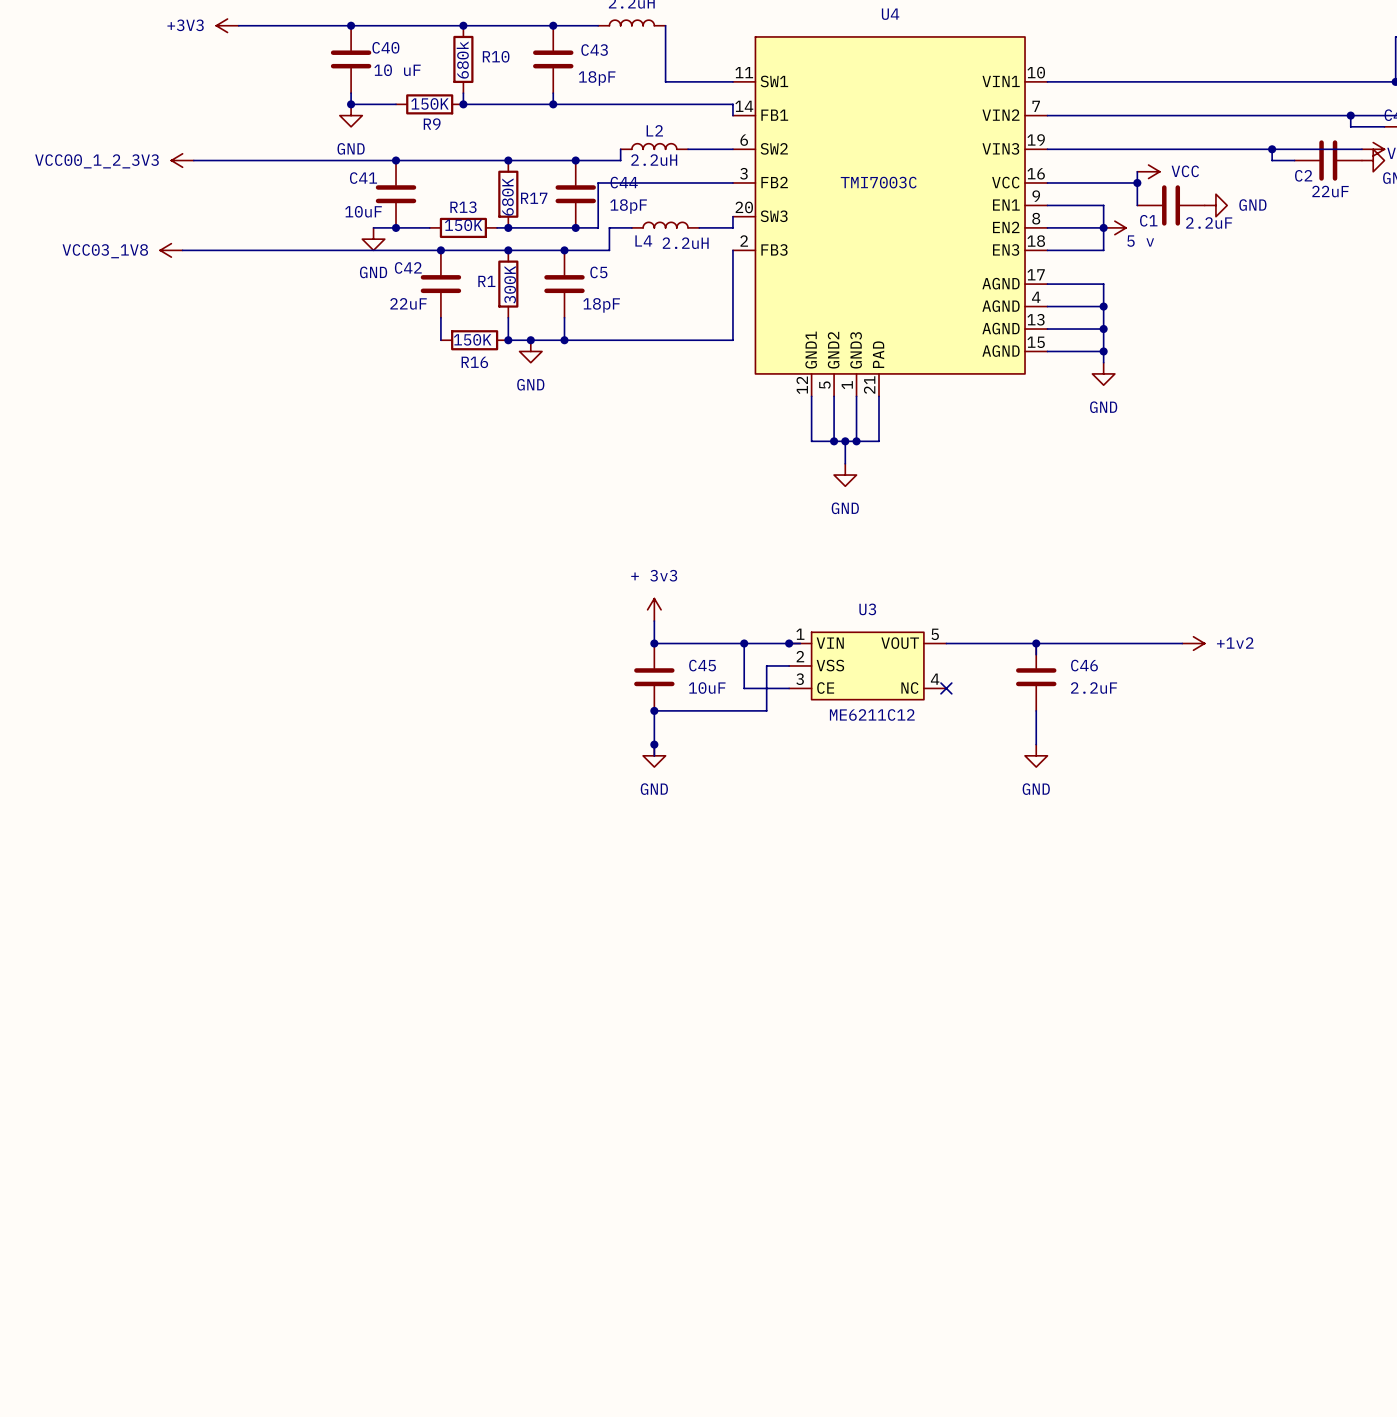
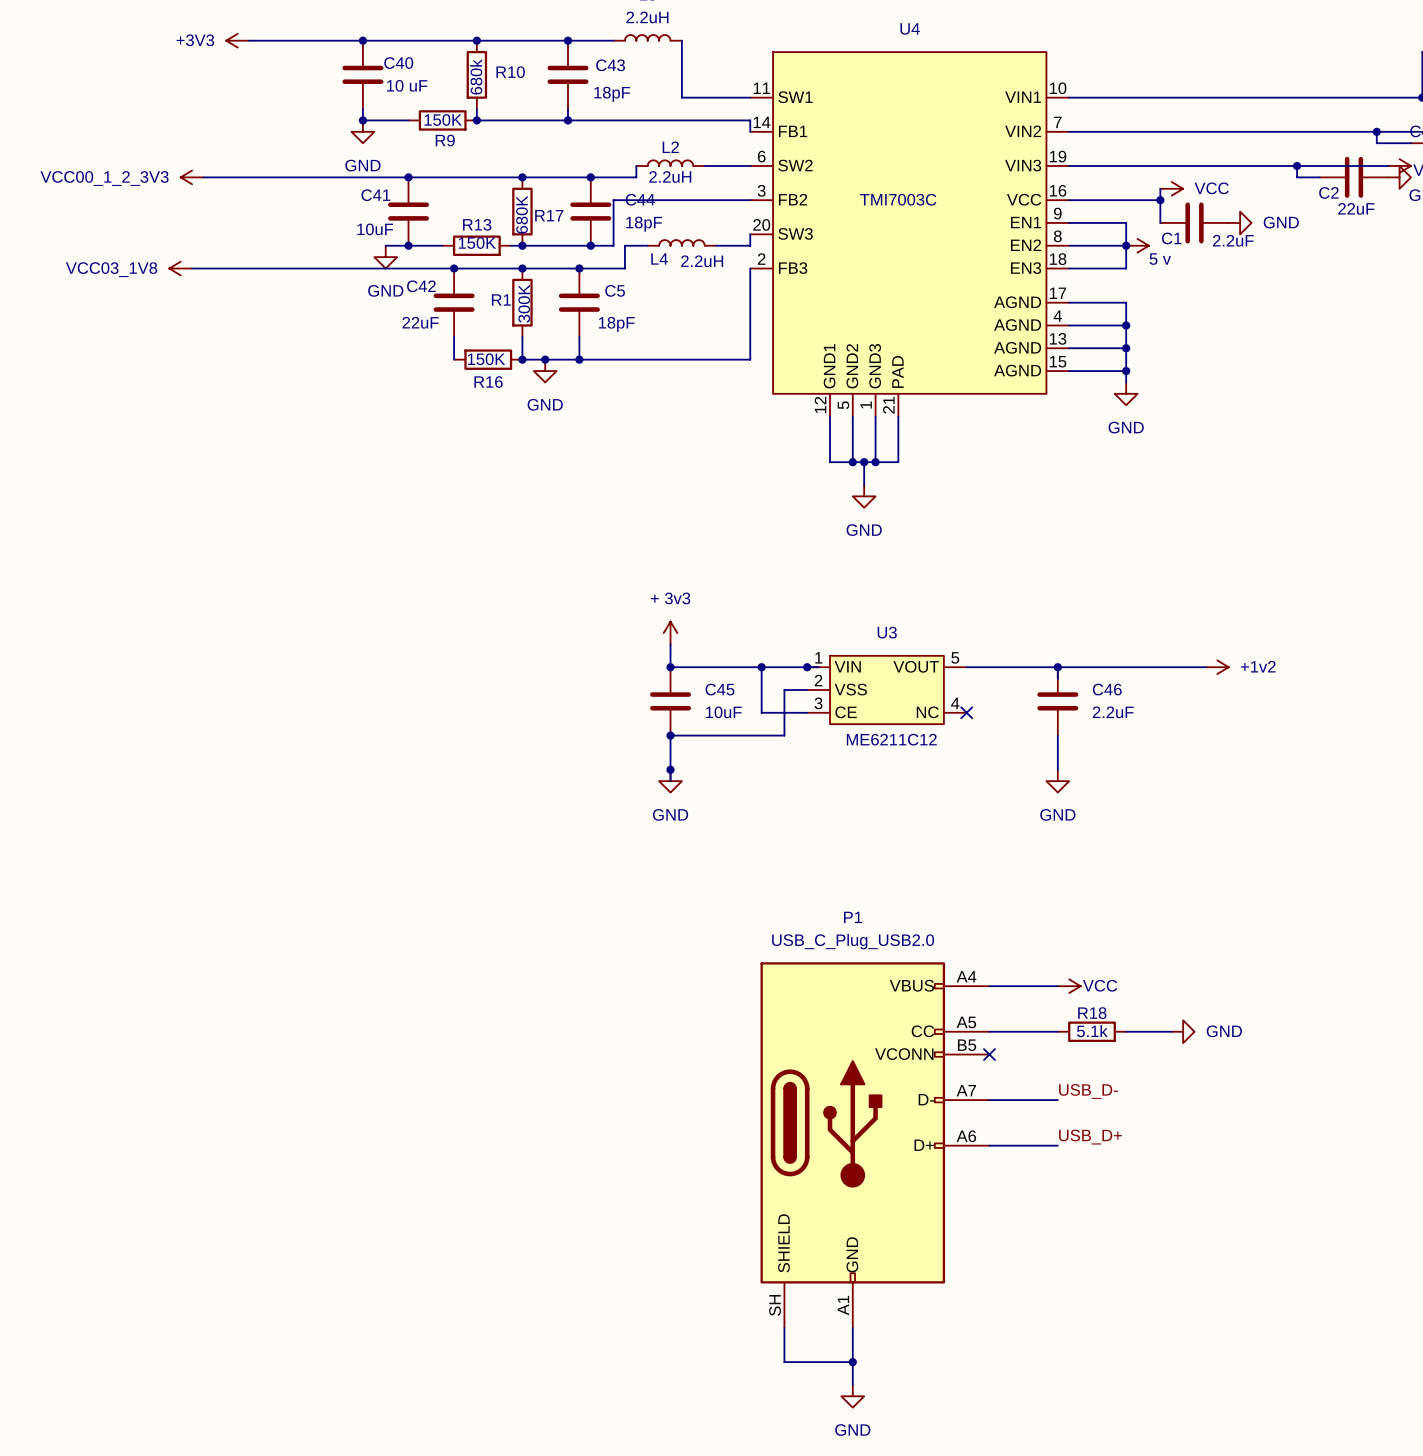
wire: none -> (989, 986) (1057, 986)
power symbol: none -> VCC (1069, 986)
wire: none -> (989, 1031) (1057, 1031)
R18: none -> 5.1k (1092, 1031)
wire: none -> (1126, 1031) (1171, 1031)
power symbol: none -> GND (1183, 1031)
no-connect mark: none -> (989, 1054)
label: none -> USB_D- (1088, 1091)
wire: none -> (989, 1100) (1057, 1100)
label: none -> USB_D+ (1090, 1137)
P1: none -> USB_C_Plug_USB2.0 (874, 1145)
wire: none -> (989, 1145) (1057, 1145)
wire: none -> (784, 1327) (784, 1362) (852, 1362)
wire: none -> (852, 1327) (852, 1384)
junction: none -> (852, 1362)
power symbol: none -> GND (852, 1396)

